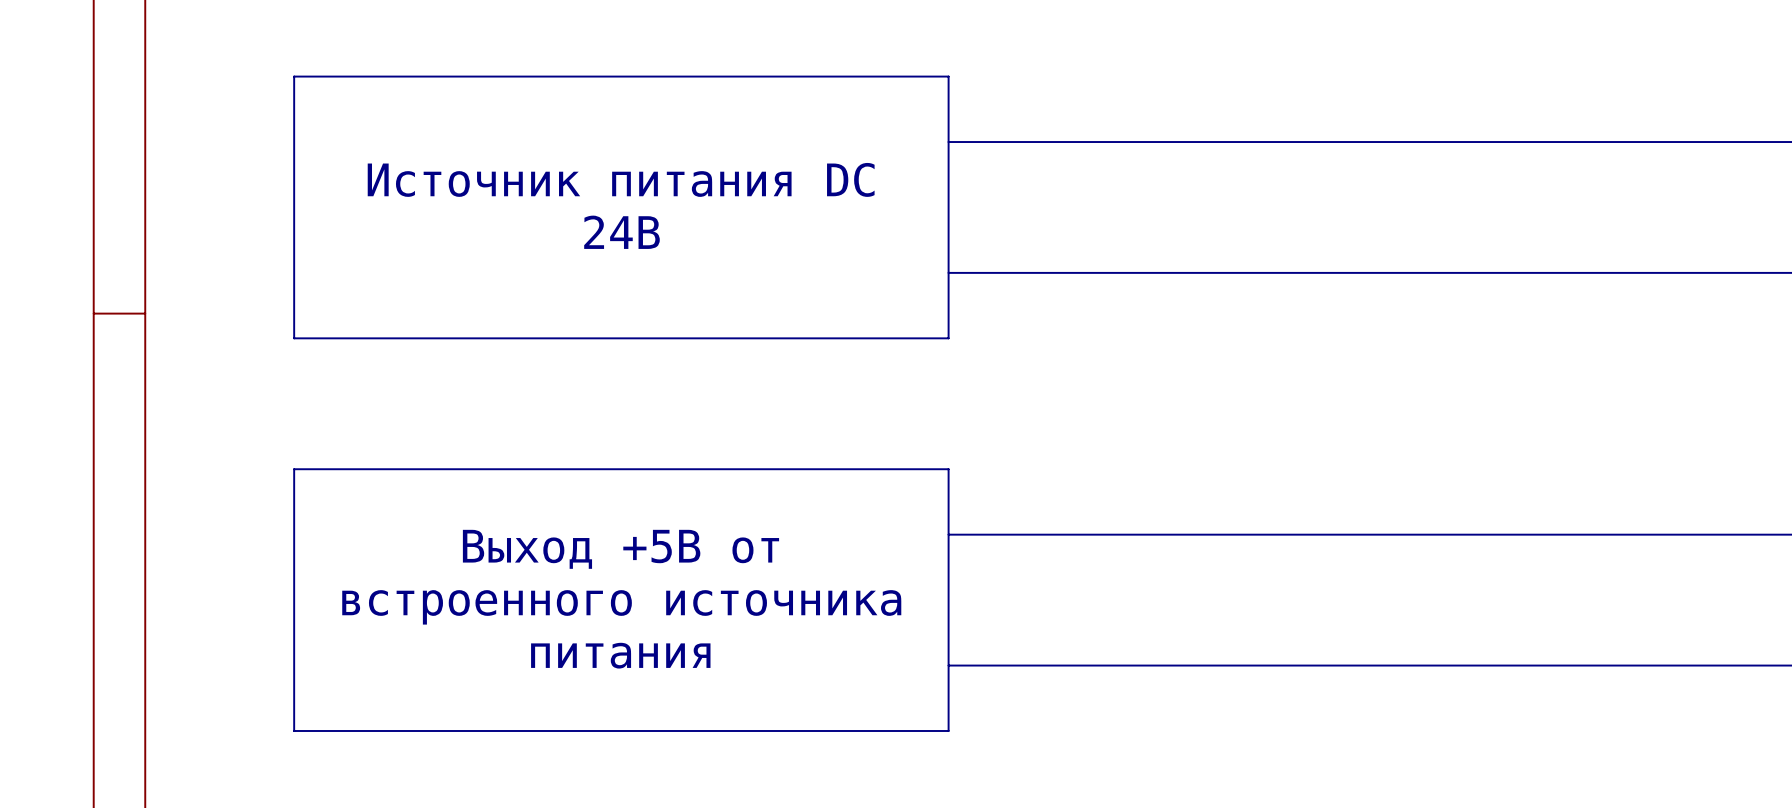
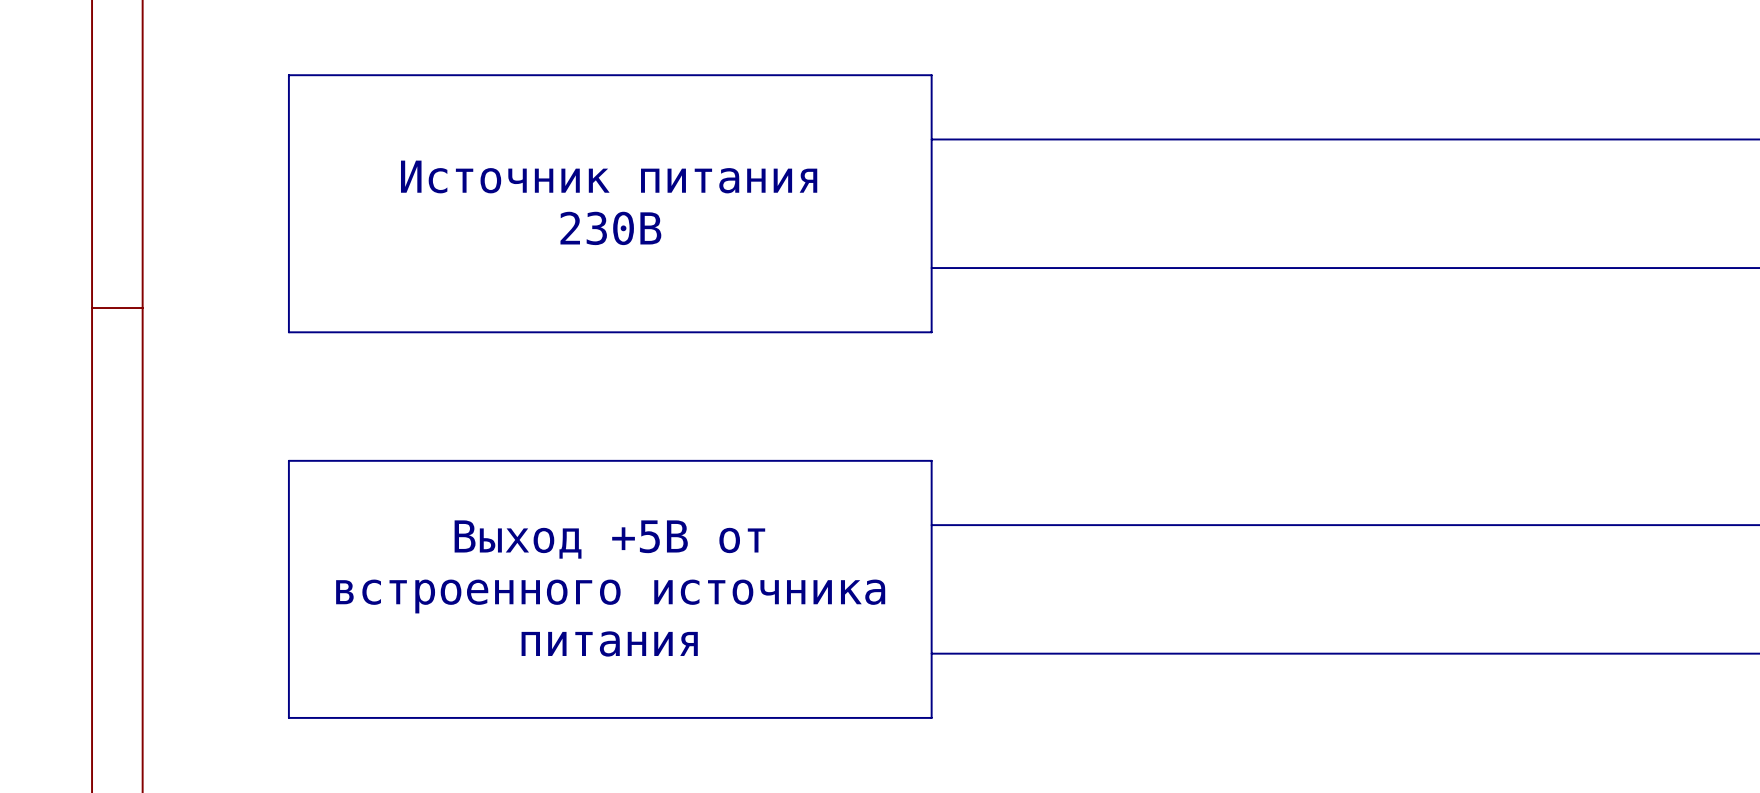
text: Источник питания DC (621, 179) -> Источник питания (609, 176)
text: 24В (621, 232) -> 230В (610, 228)

